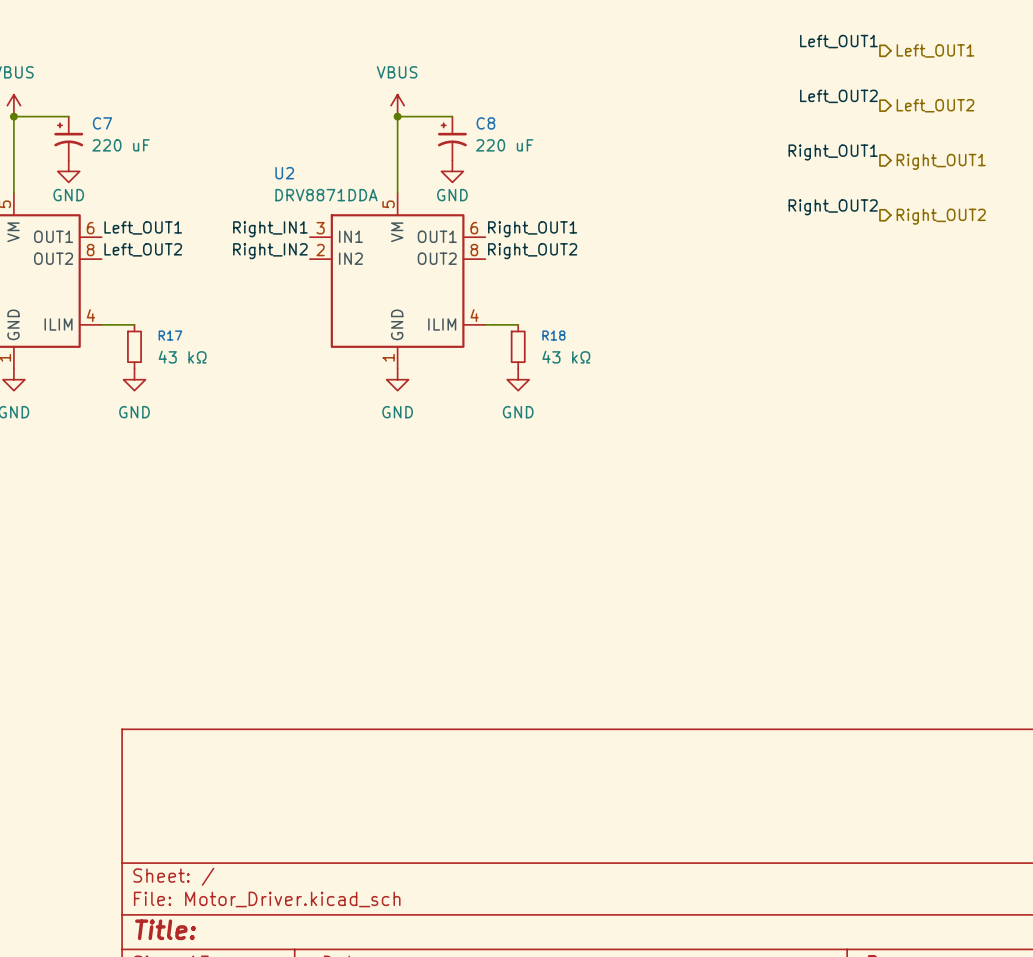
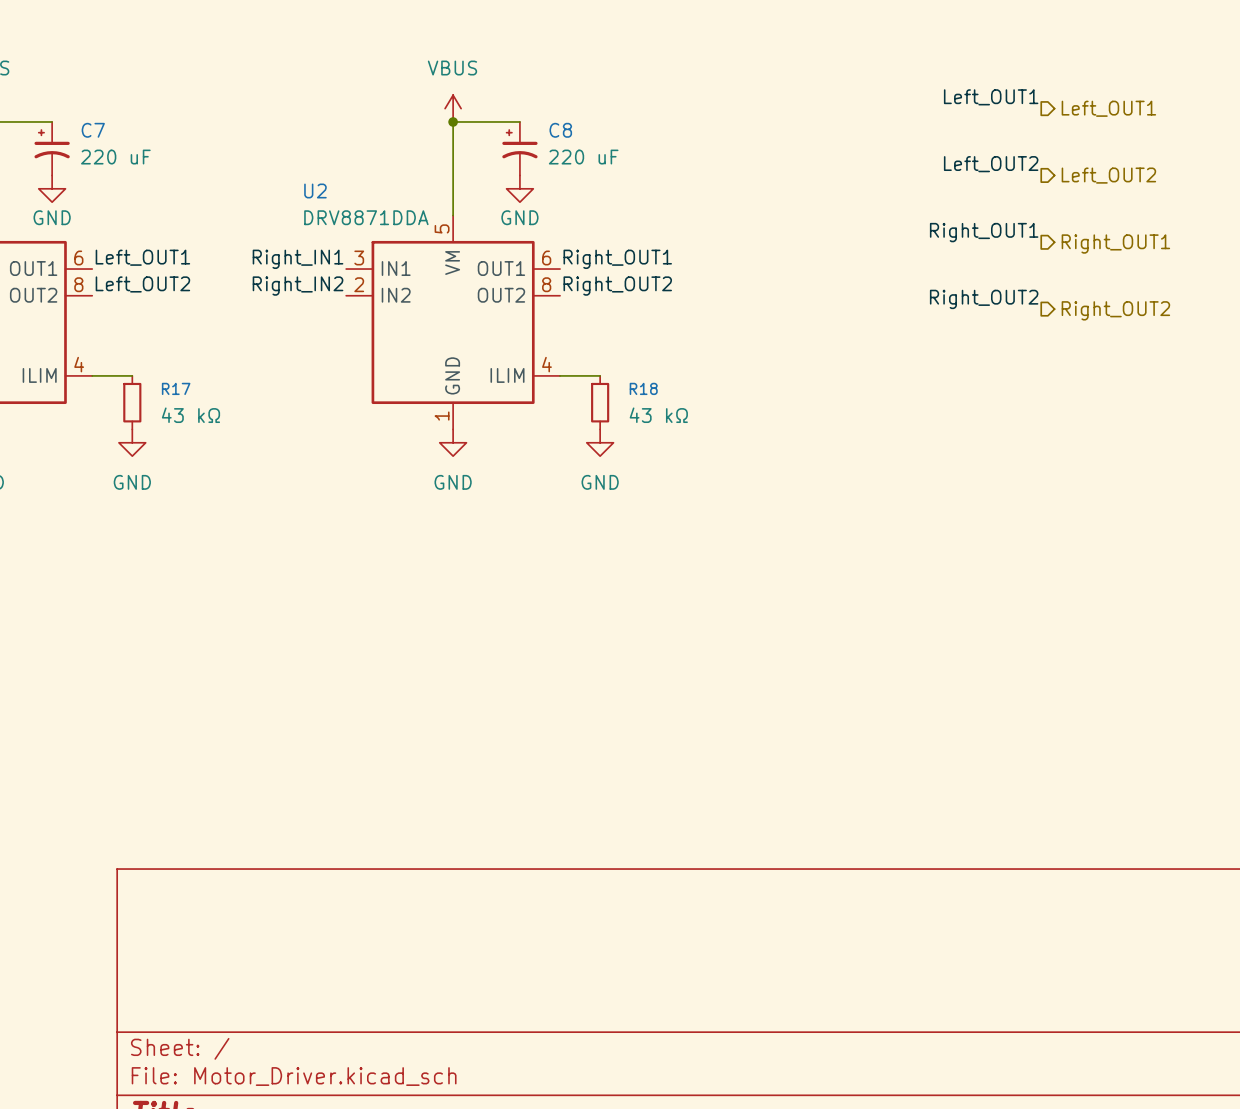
label: Left_OUT1 (838, 41) -> none
hierarchical label: Left_OUT1 (935, 50) -> none
label: Left_OUT2 (838, 96) -> Left_OUT1 (991, 97)
hierarchical label: Left_OUT2 (935, 105) -> Left_OUT1 (1108, 108)
label: Right_OUT1 (833, 152) -> Left_OUT2 (991, 164)
hierarchical label: Right_OUT1 (941, 161) -> Left_OUT2 (1108, 175)
label: Right_OUT2 (833, 207) -> Right_OUT1 (984, 232)
hierarchical label: Right_OUT2 (941, 216) -> Right_OUT1 (1115, 244)
label: none -> Right_OUT2 (984, 299)
hierarchical label: none -> Right_OUT2 (1115, 310)

